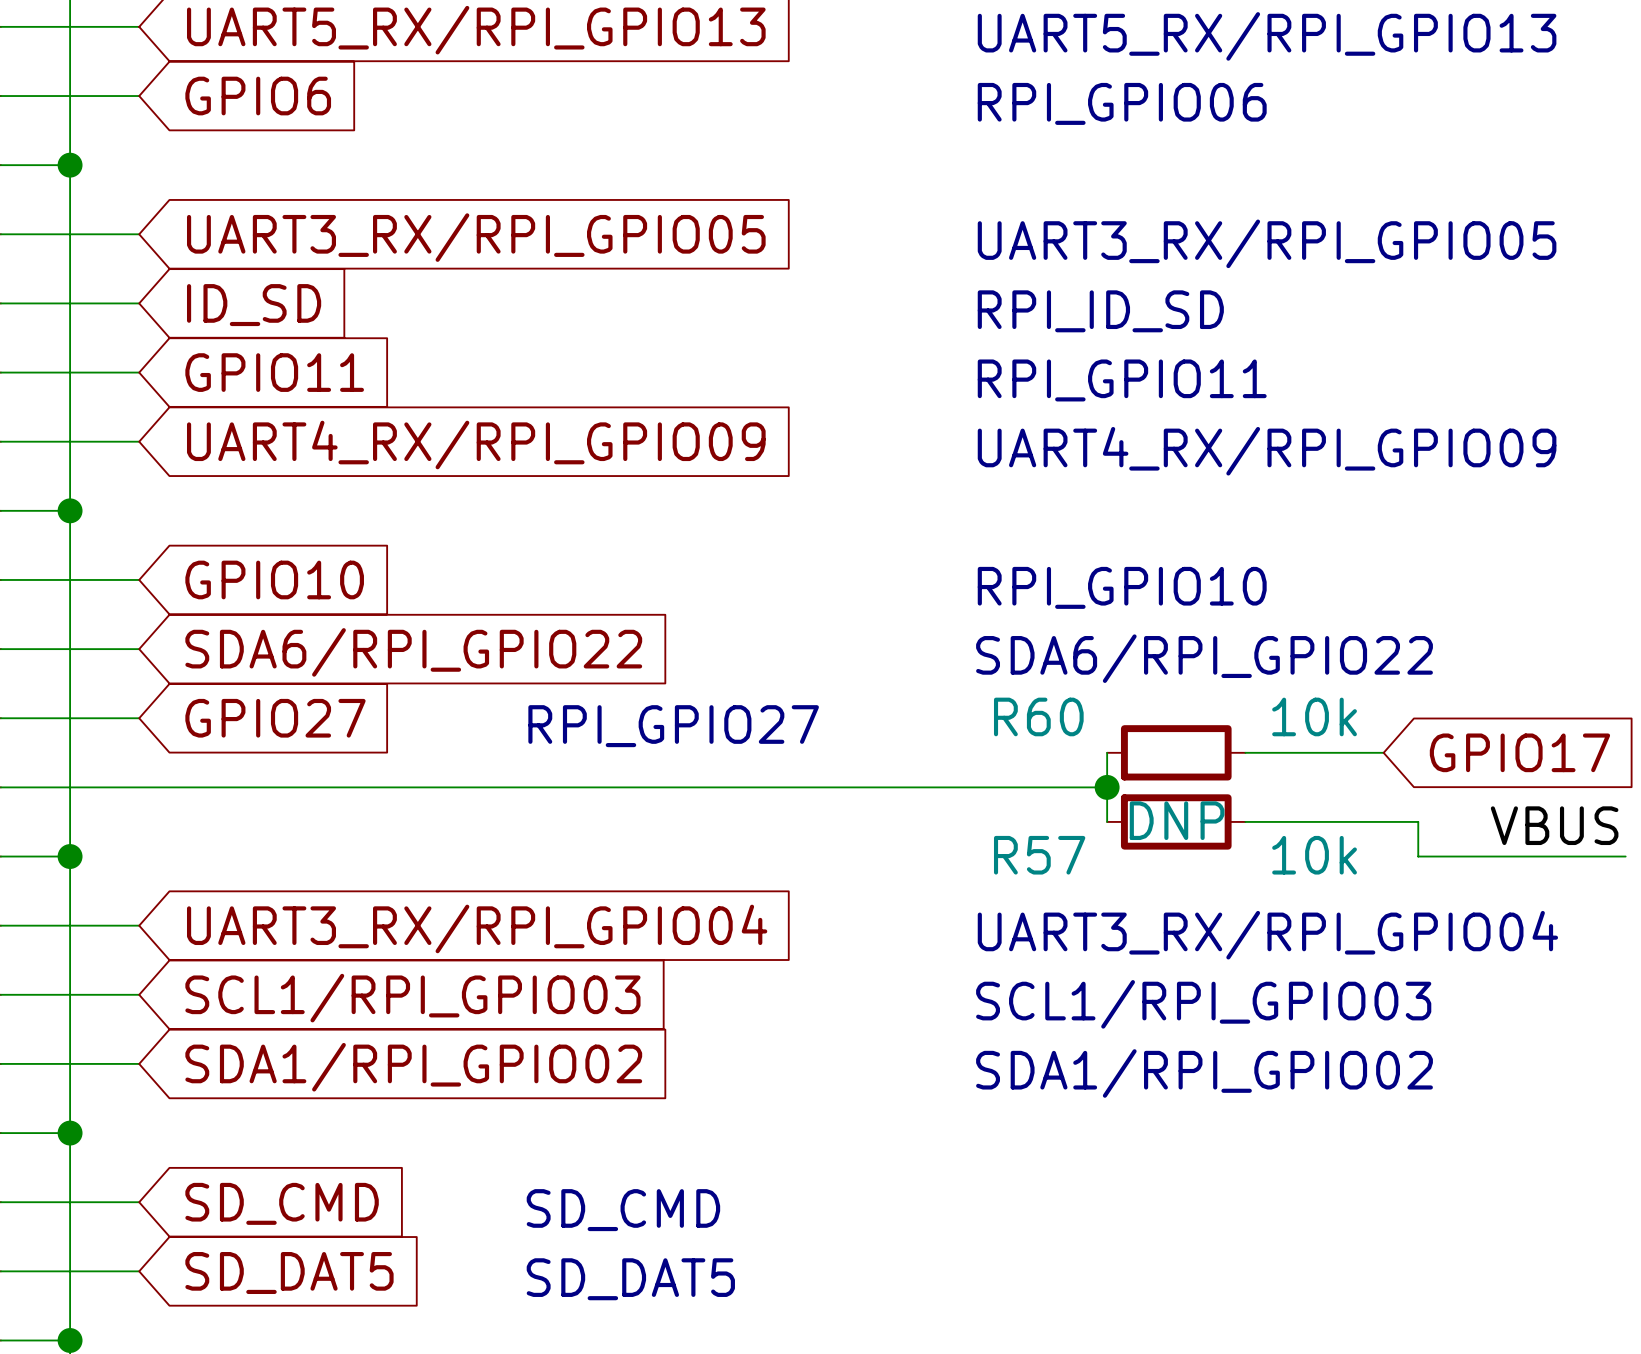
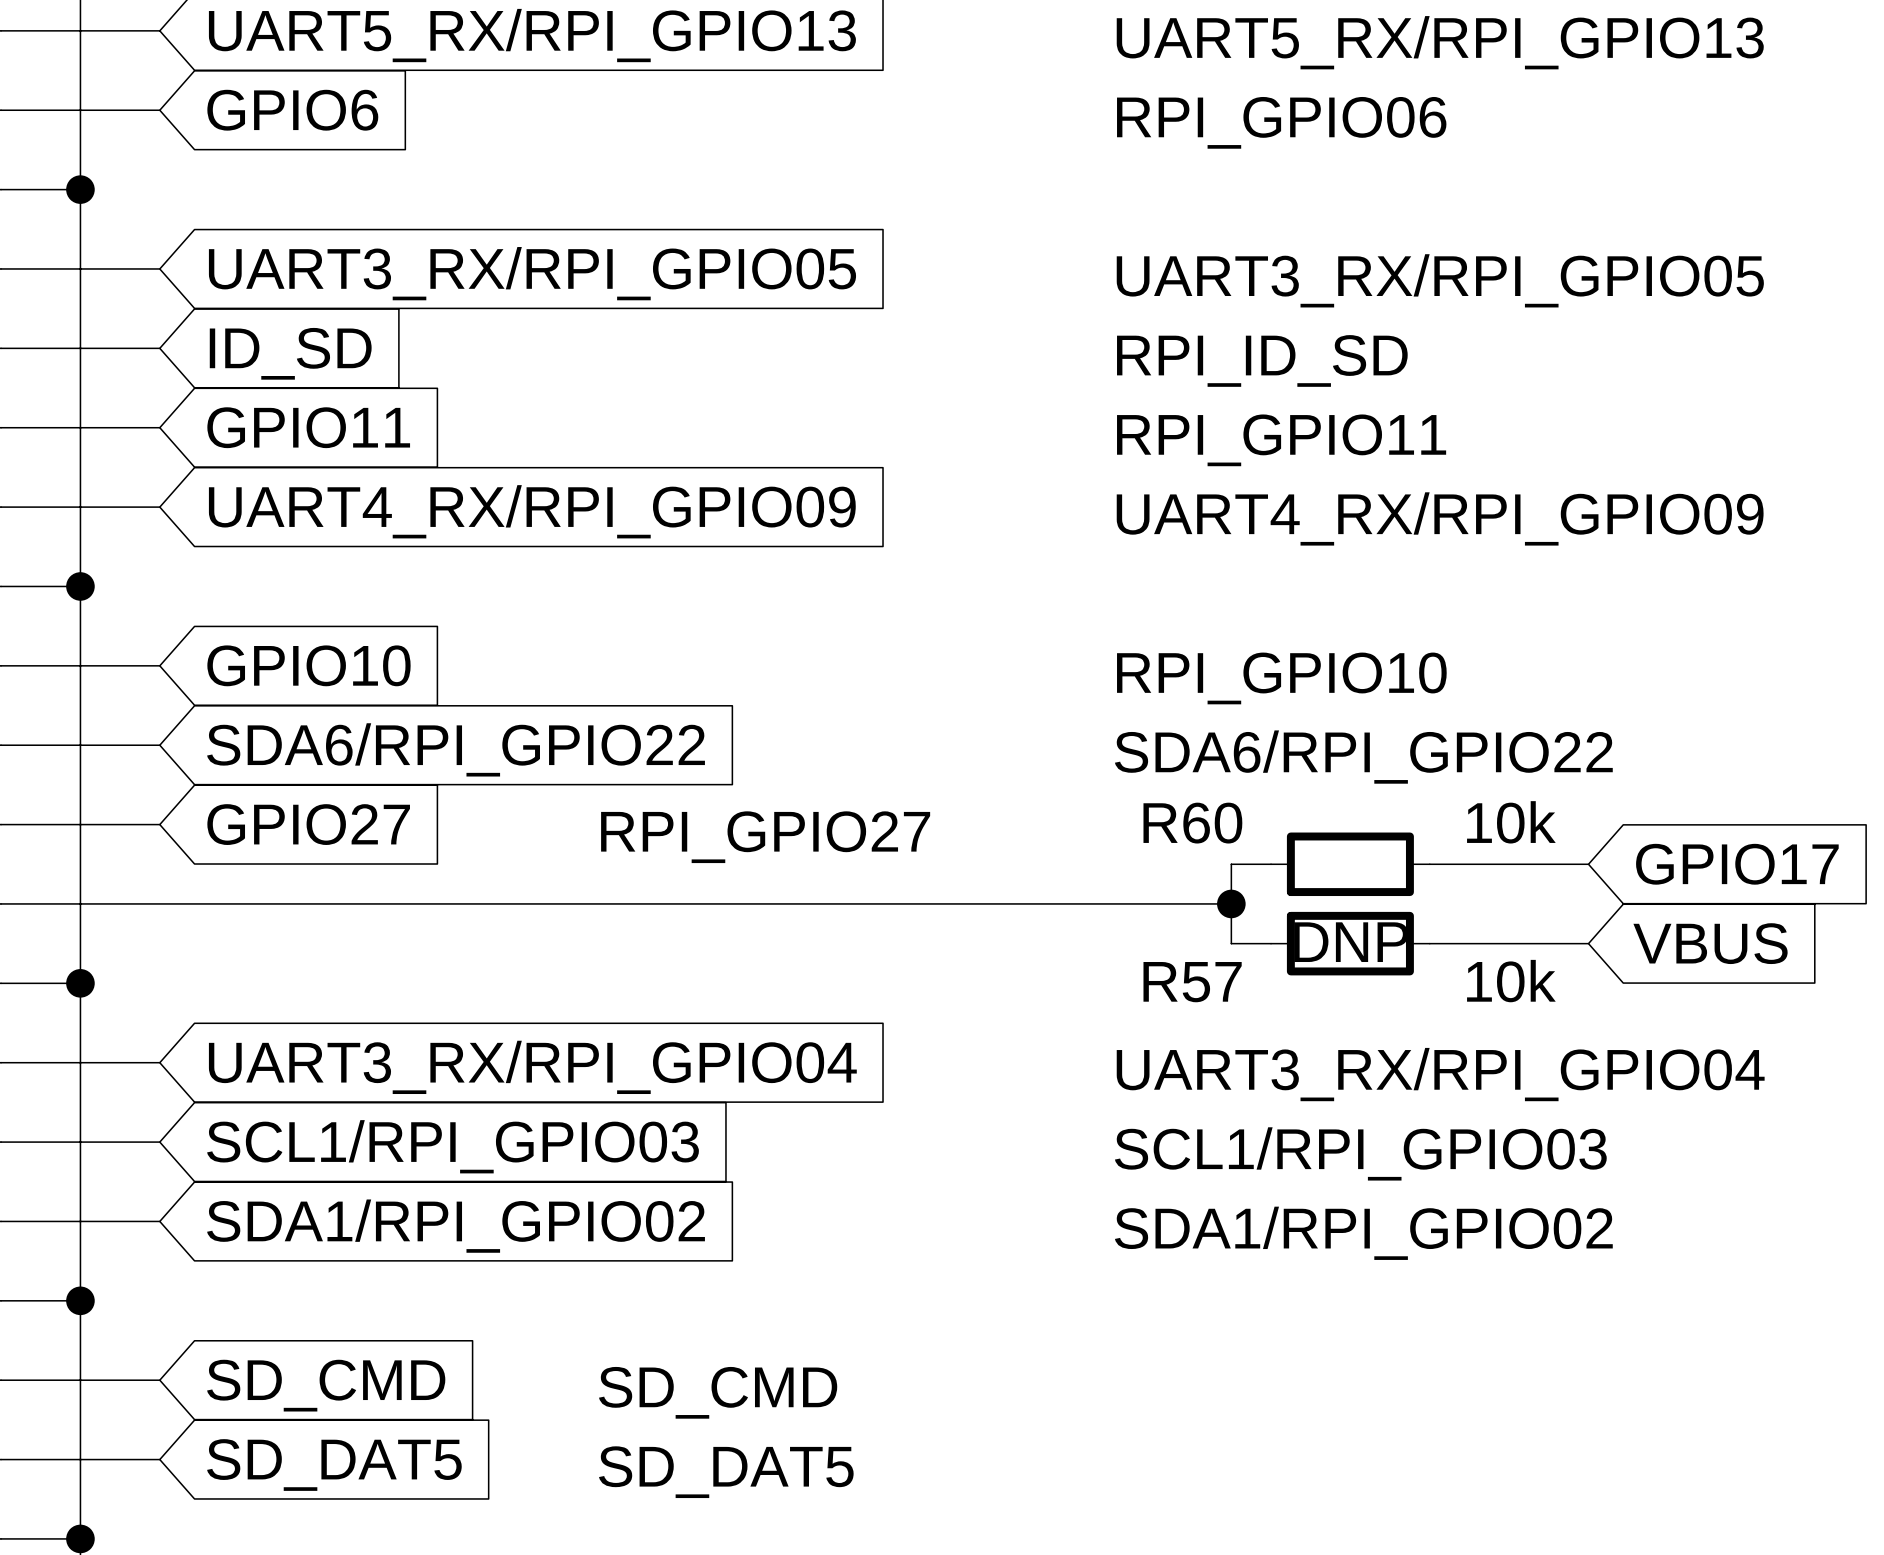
wire: (1107, 752) (1107, 821) -> (1271, 864) (1231, 864) (1231, 943) (1271, 943)
wire: (1072, 787) (1107, 787) -> none
junction position: (1107, 787) -> (1231, 903)
wire: (1383, 821) (1418, 821) (1418, 856) (1625, 856) -> none
global label: none -> VBUS (1710, 943)
label: VBUS (1554, 825) -> none

